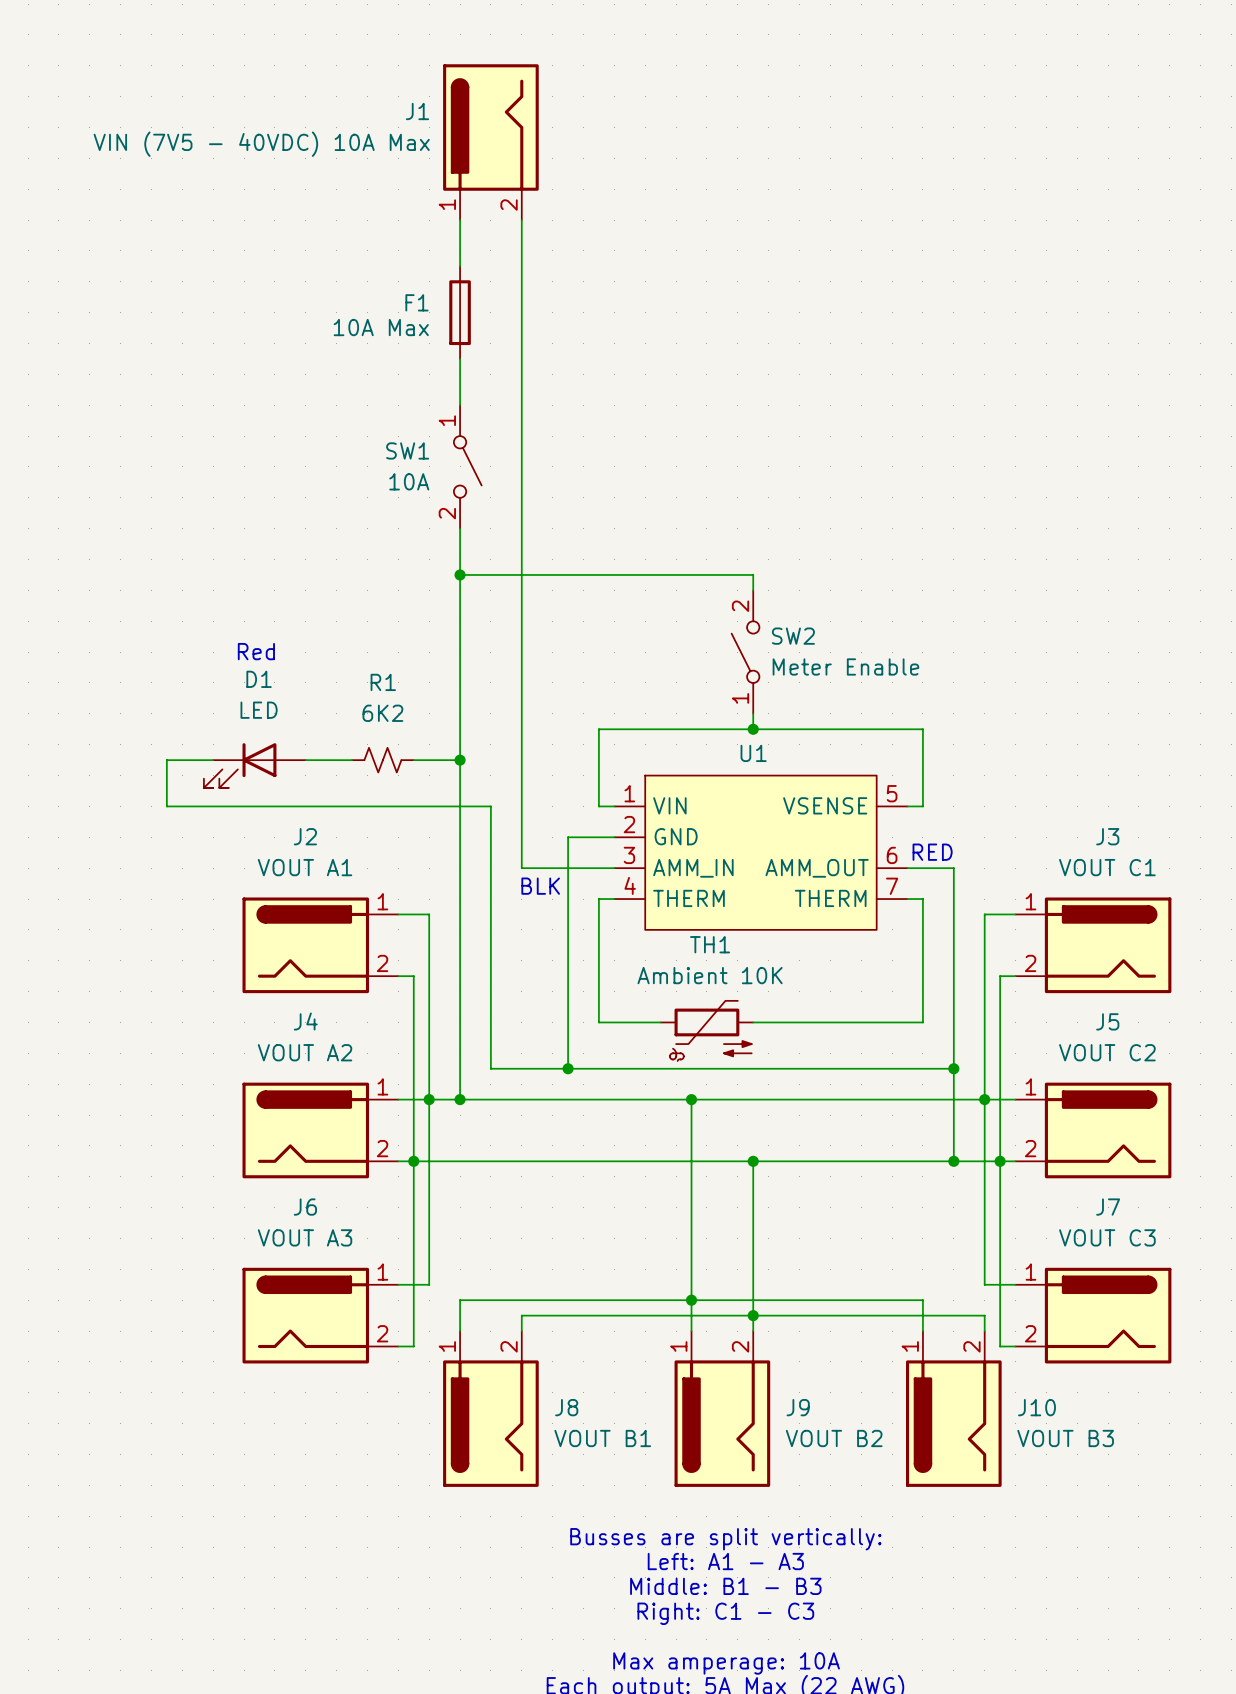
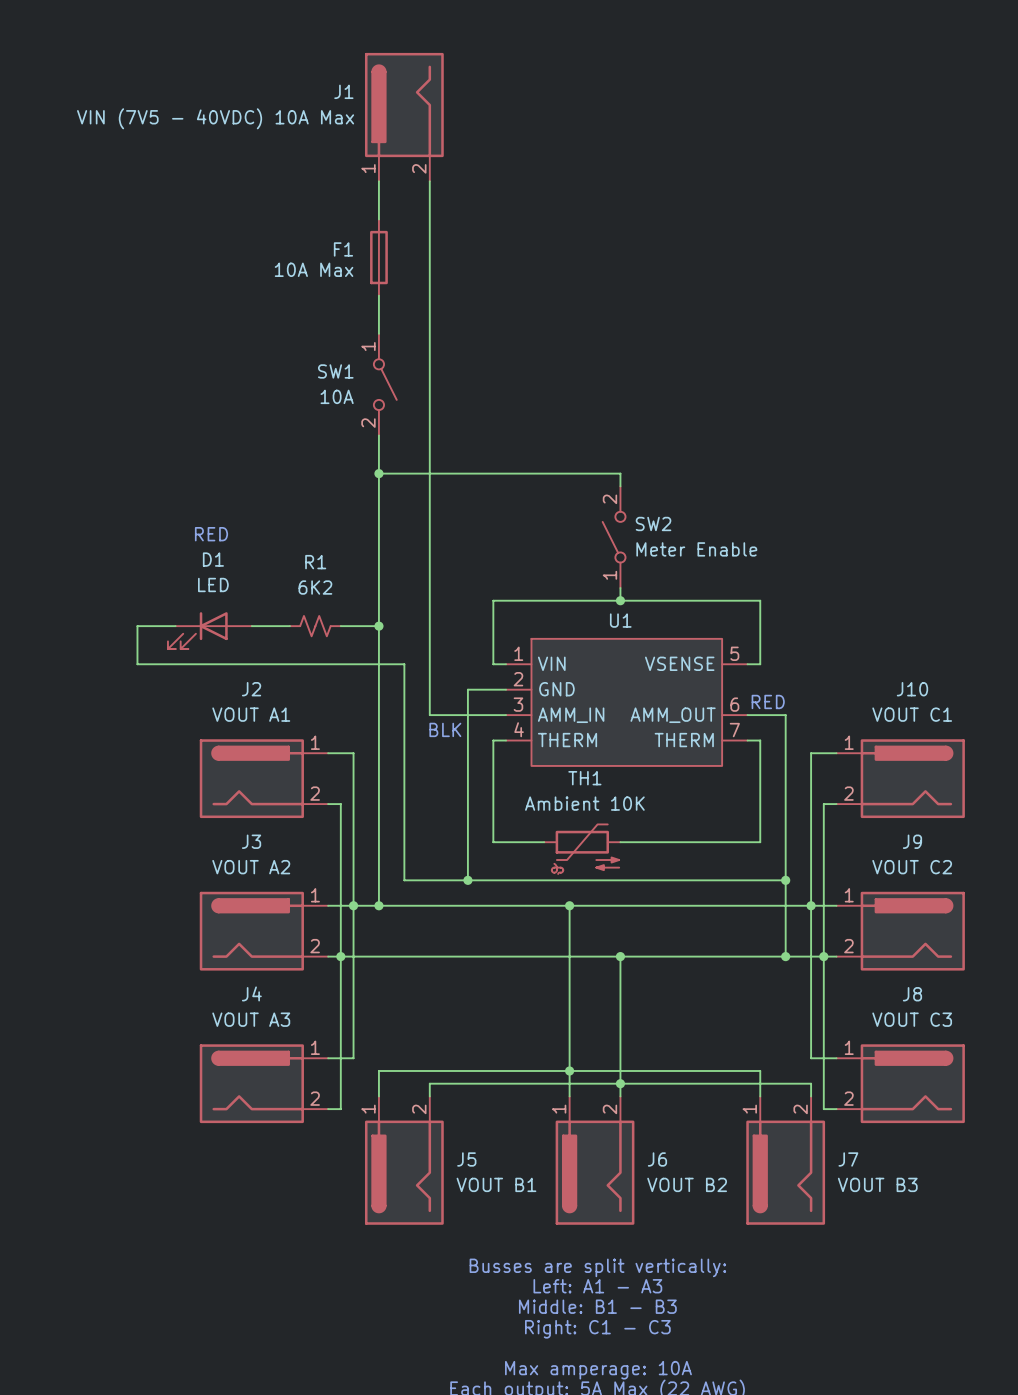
text: Red (256, 651) -> RED (211, 534)
J3 name: J3 (1107, 836) -> J10 (912, 689)
J4 name: J4 (305, 1021) -> J3 (251, 841)
J5 name: J5 (1107, 1021) -> J9 (912, 841)
J6 name: J6 (305, 1207) -> J4 (251, 993)
J7 name: J7 (1108, 1207) -> J8 (912, 994)
J8 name: J8 (566, 1407) -> J5 (466, 1159)
J9 name: J9 (798, 1407) -> J6 (657, 1159)
J10 name: J10 (1036, 1407) -> J7 (848, 1159)

